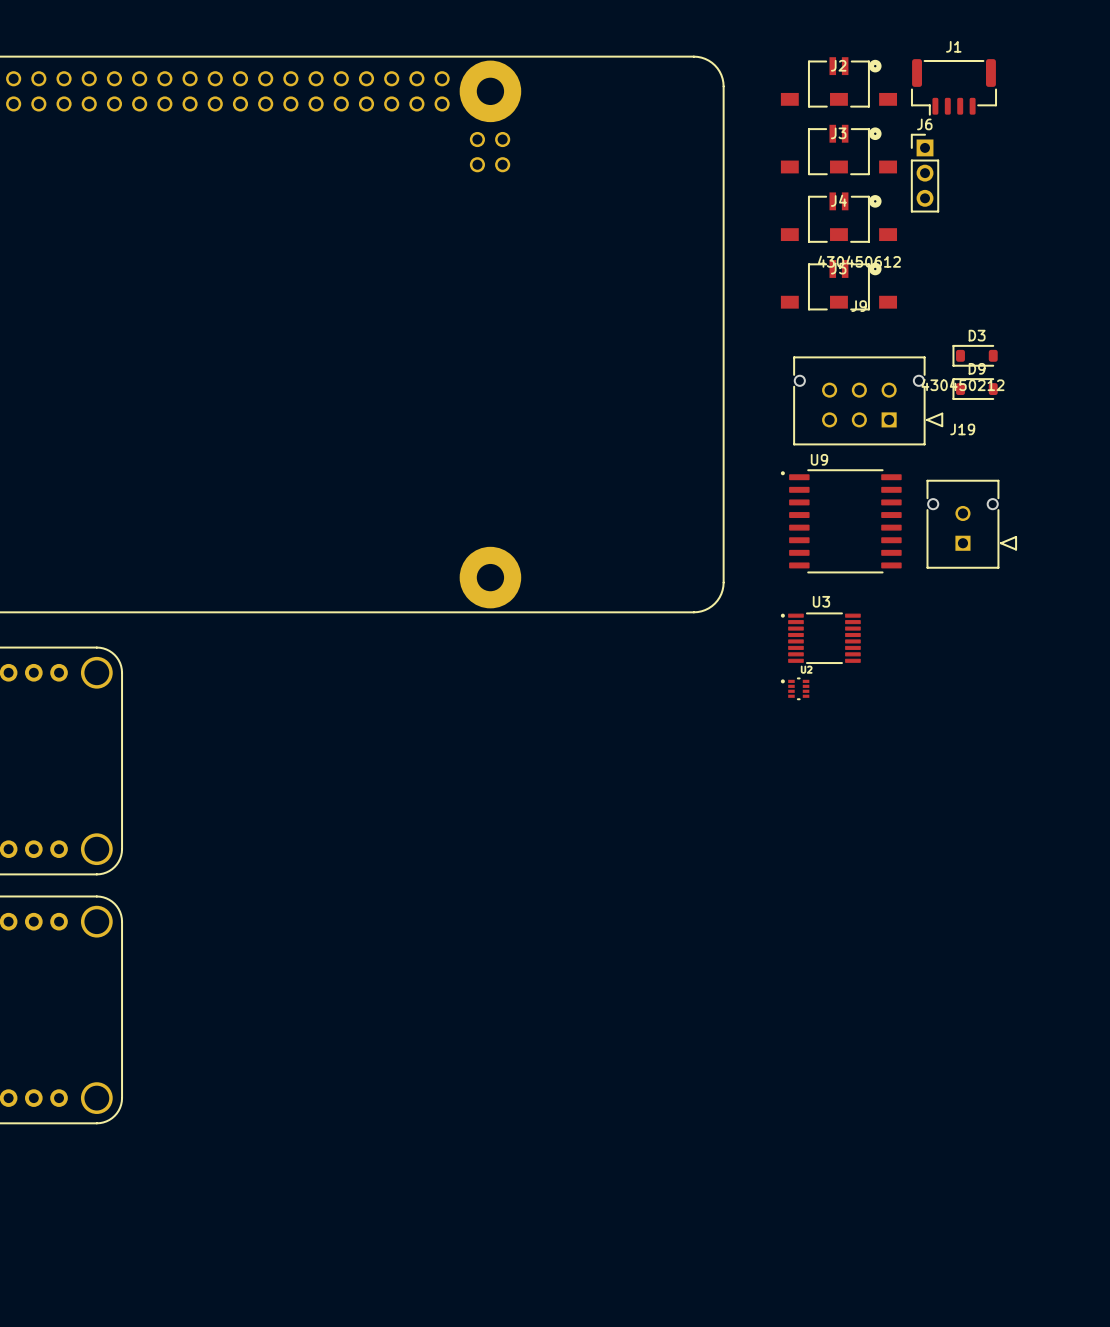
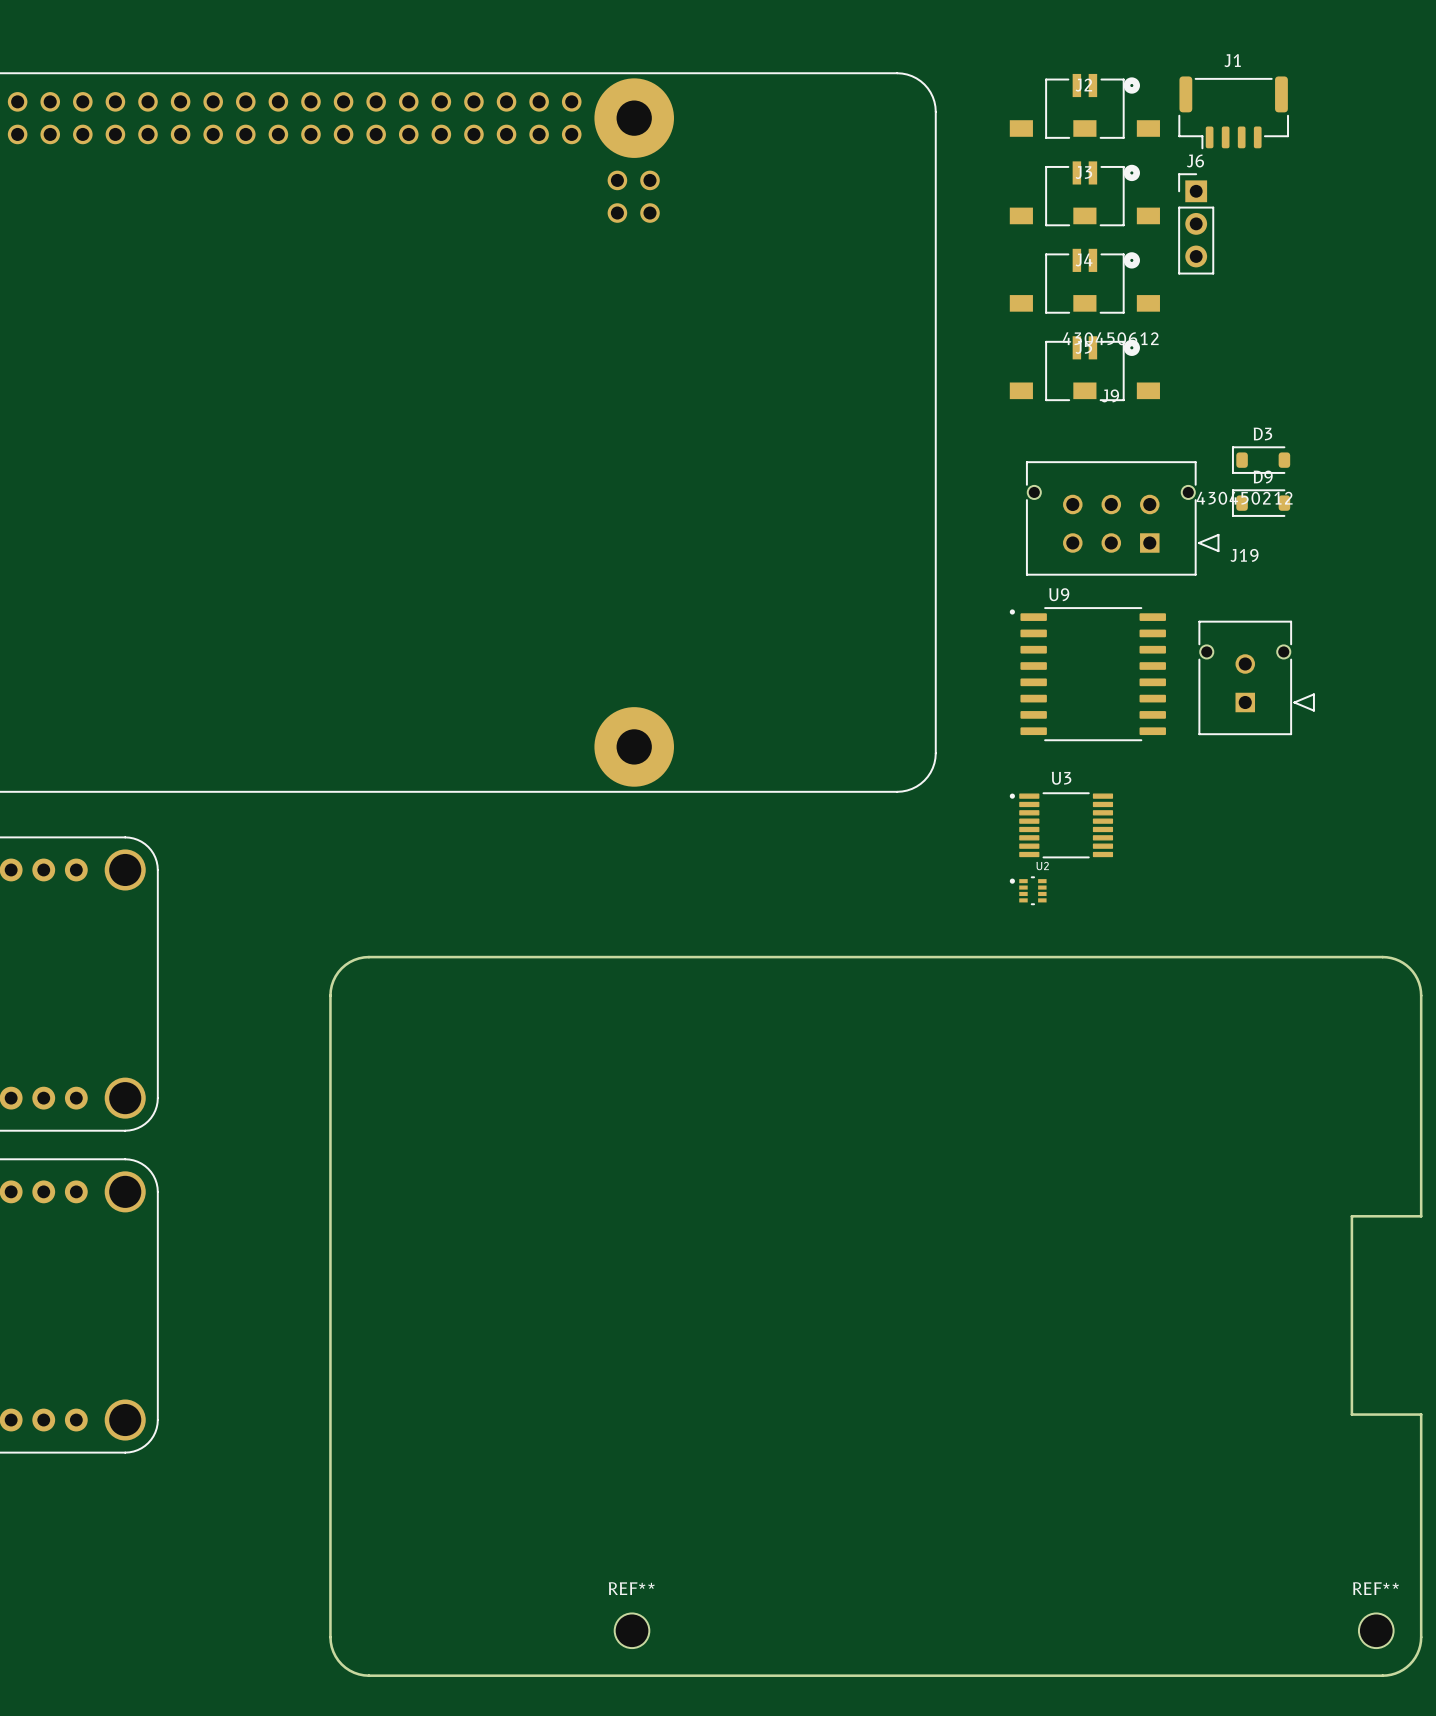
board edge: none -> (368, 957) (1382, 957) (1403, 962) (1415, 975) (1420, 991) (1421, 1216) (1351, 1216) (1351, 1414) (1421, 1414) (1421, 1637) (1415, 1657) (1403, 1669) (1382, 1675) (368, 1675) (354, 1672) (345, 1667) (333, 1651) (330, 1637) (330, 995) (333, 980) (341, 968) (354, 960) (368, 957)
REF**: none -> (632, 1630)
REF**: none -> (1376, 1630)

